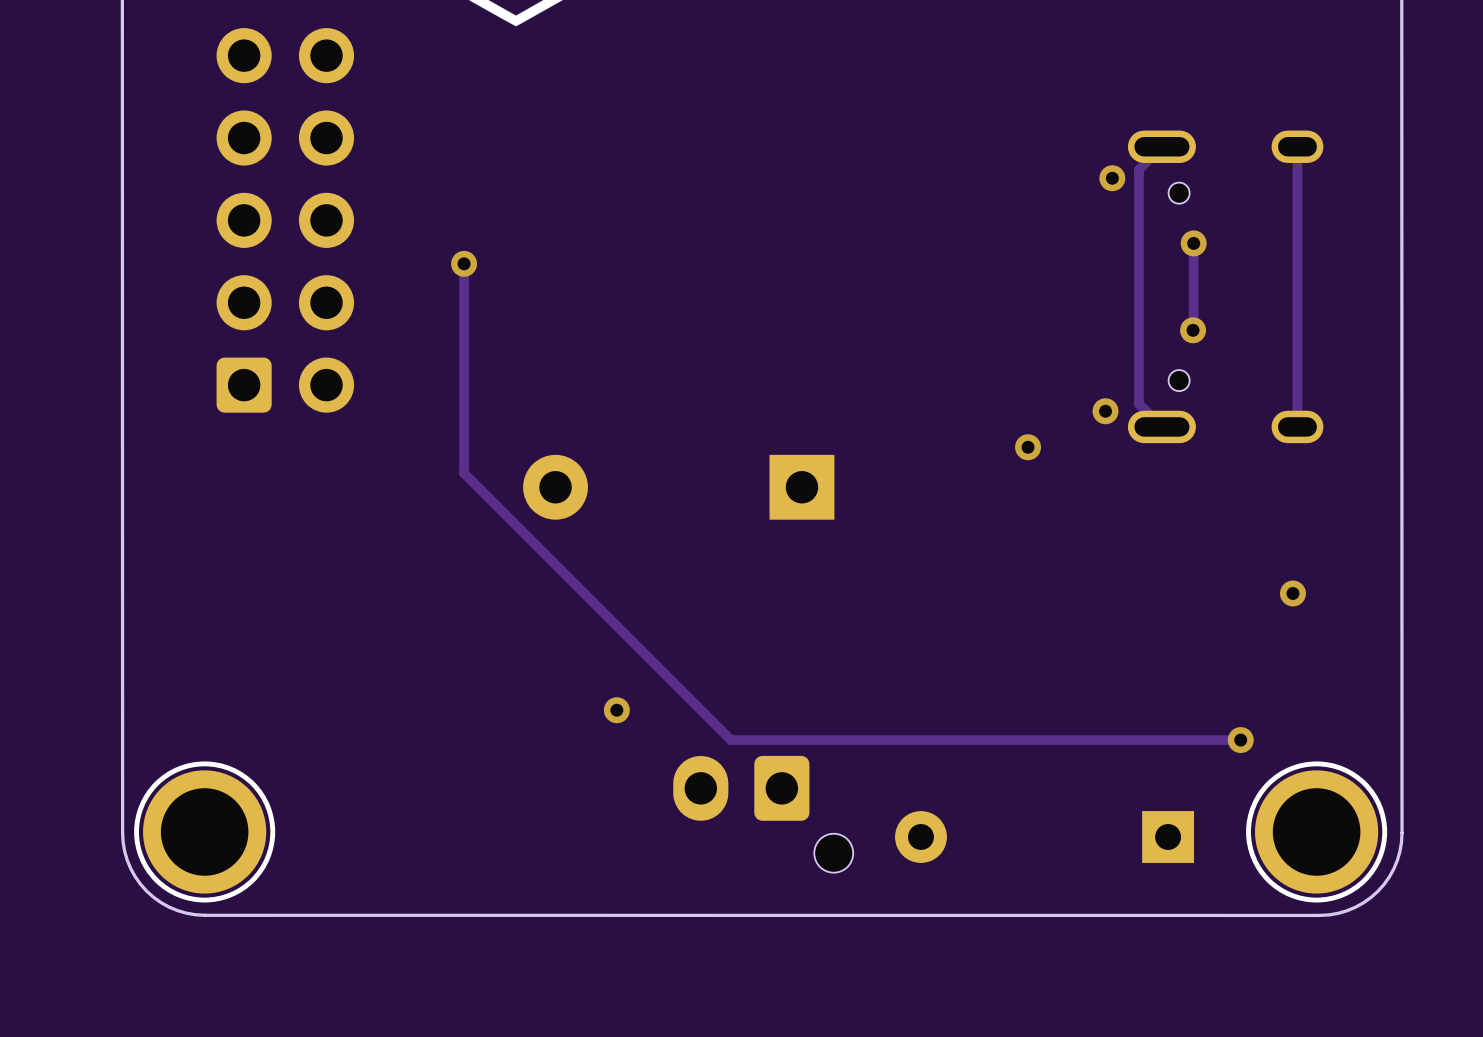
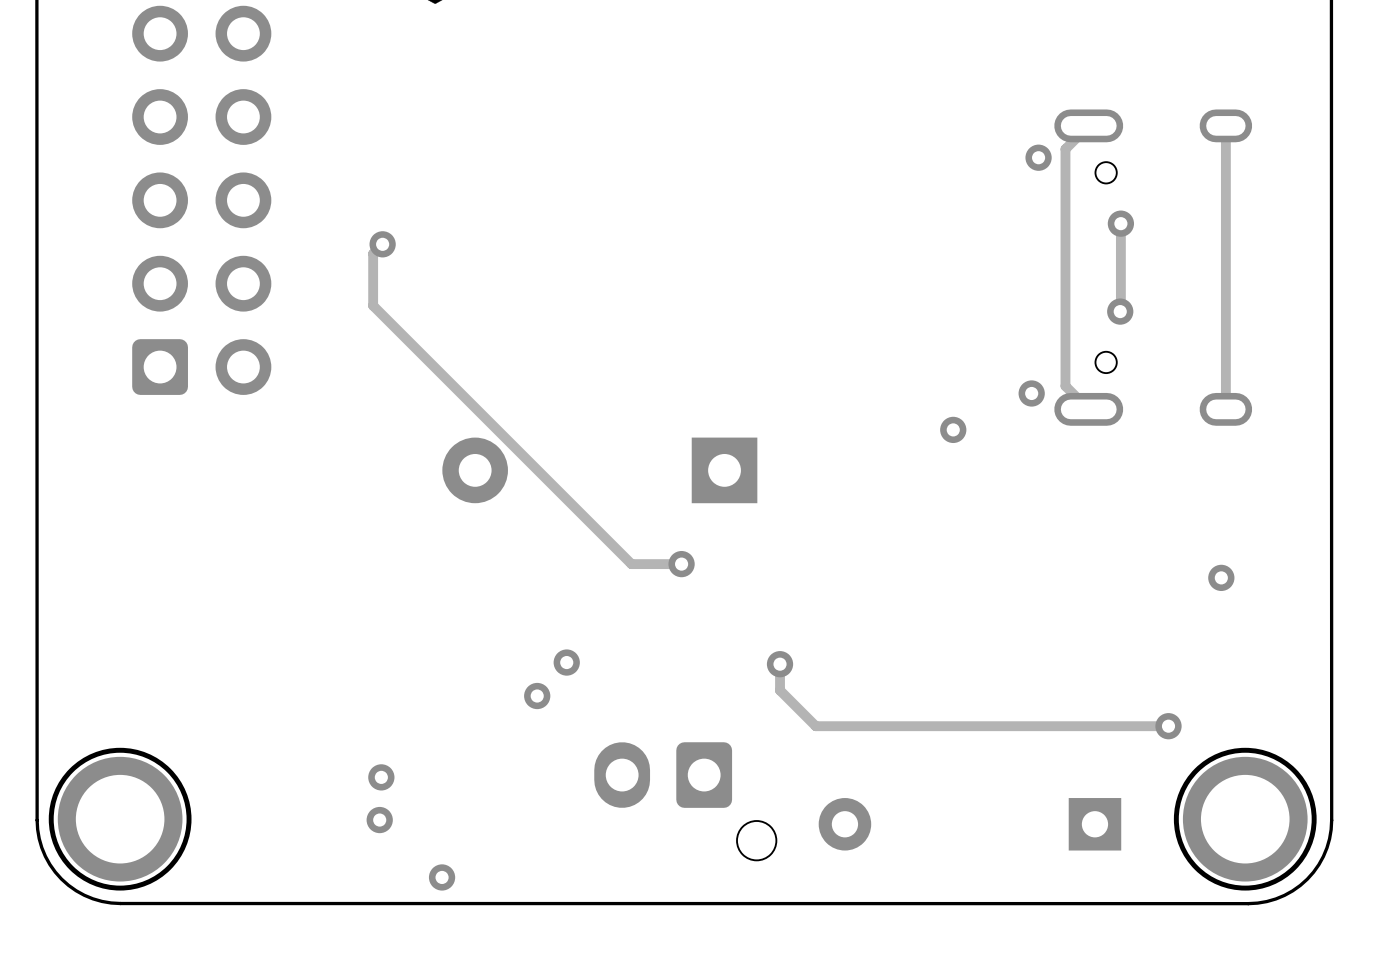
track: (464, 263) (464, 473) (730, 740) (892, 740) -> (382, 244) (373, 253) (373, 305) (631, 564) (681, 564)
via: none -> (681, 564)
via: none -> (566, 662)
track: none -> (780, 664) (780, 690) (815, 726)
via: none -> (780, 664)
via: none -> (381, 777)
via: none -> (379, 820)
via: none -> (442, 877)

